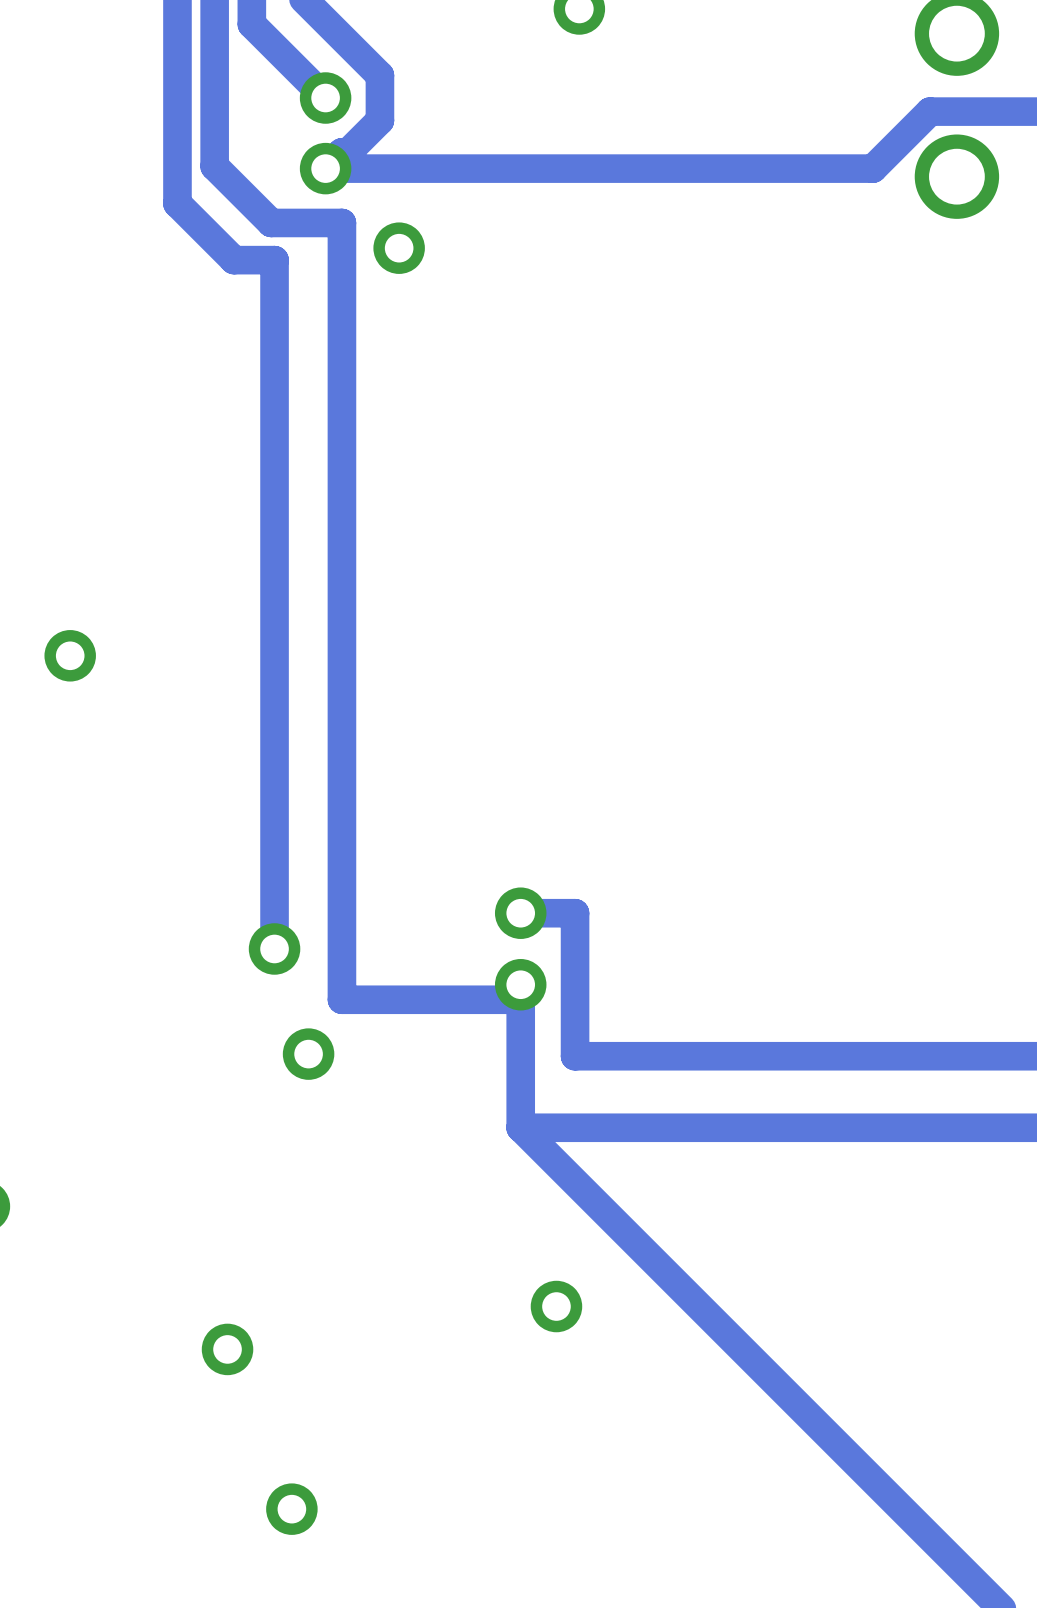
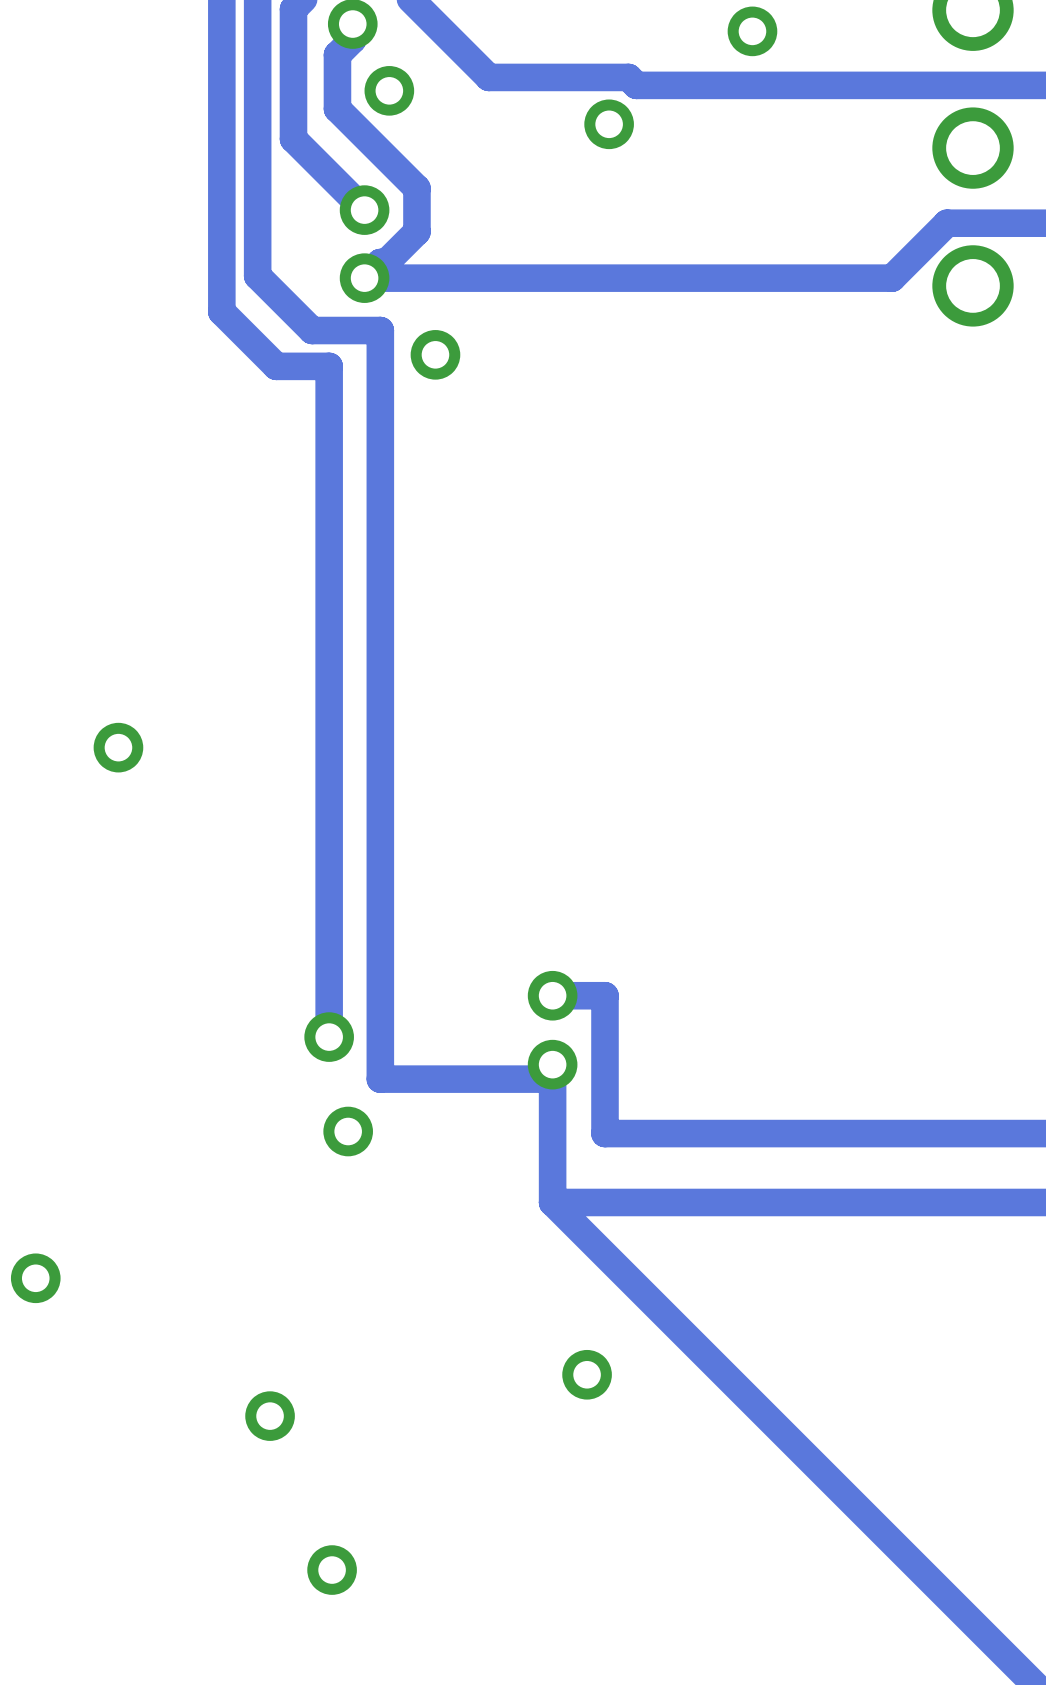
track: (274, 260) (274, 948) -> (315, 366) (329, 366) (329, 1037)
via position: (274, 948) -> (329, 1037)

